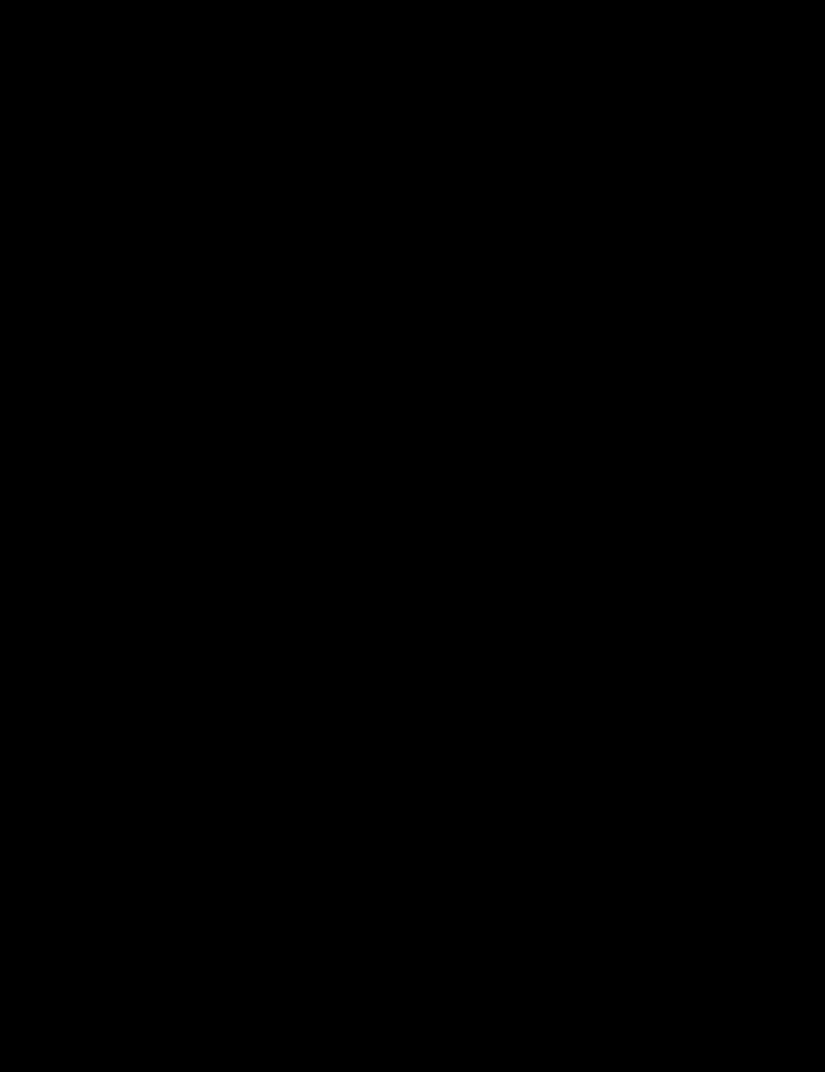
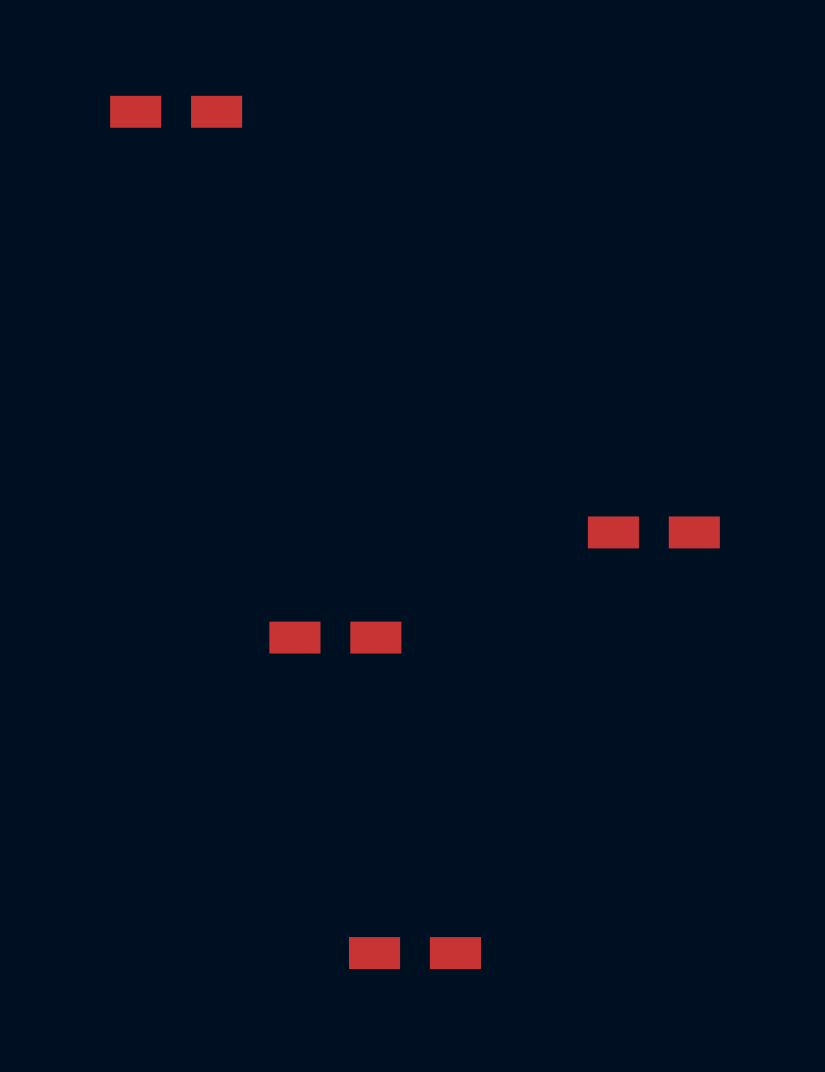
part: none -> (176, 111)
part: none -> (653, 532)
part: none -> (335, 637)
part: none -> (415, 953)

